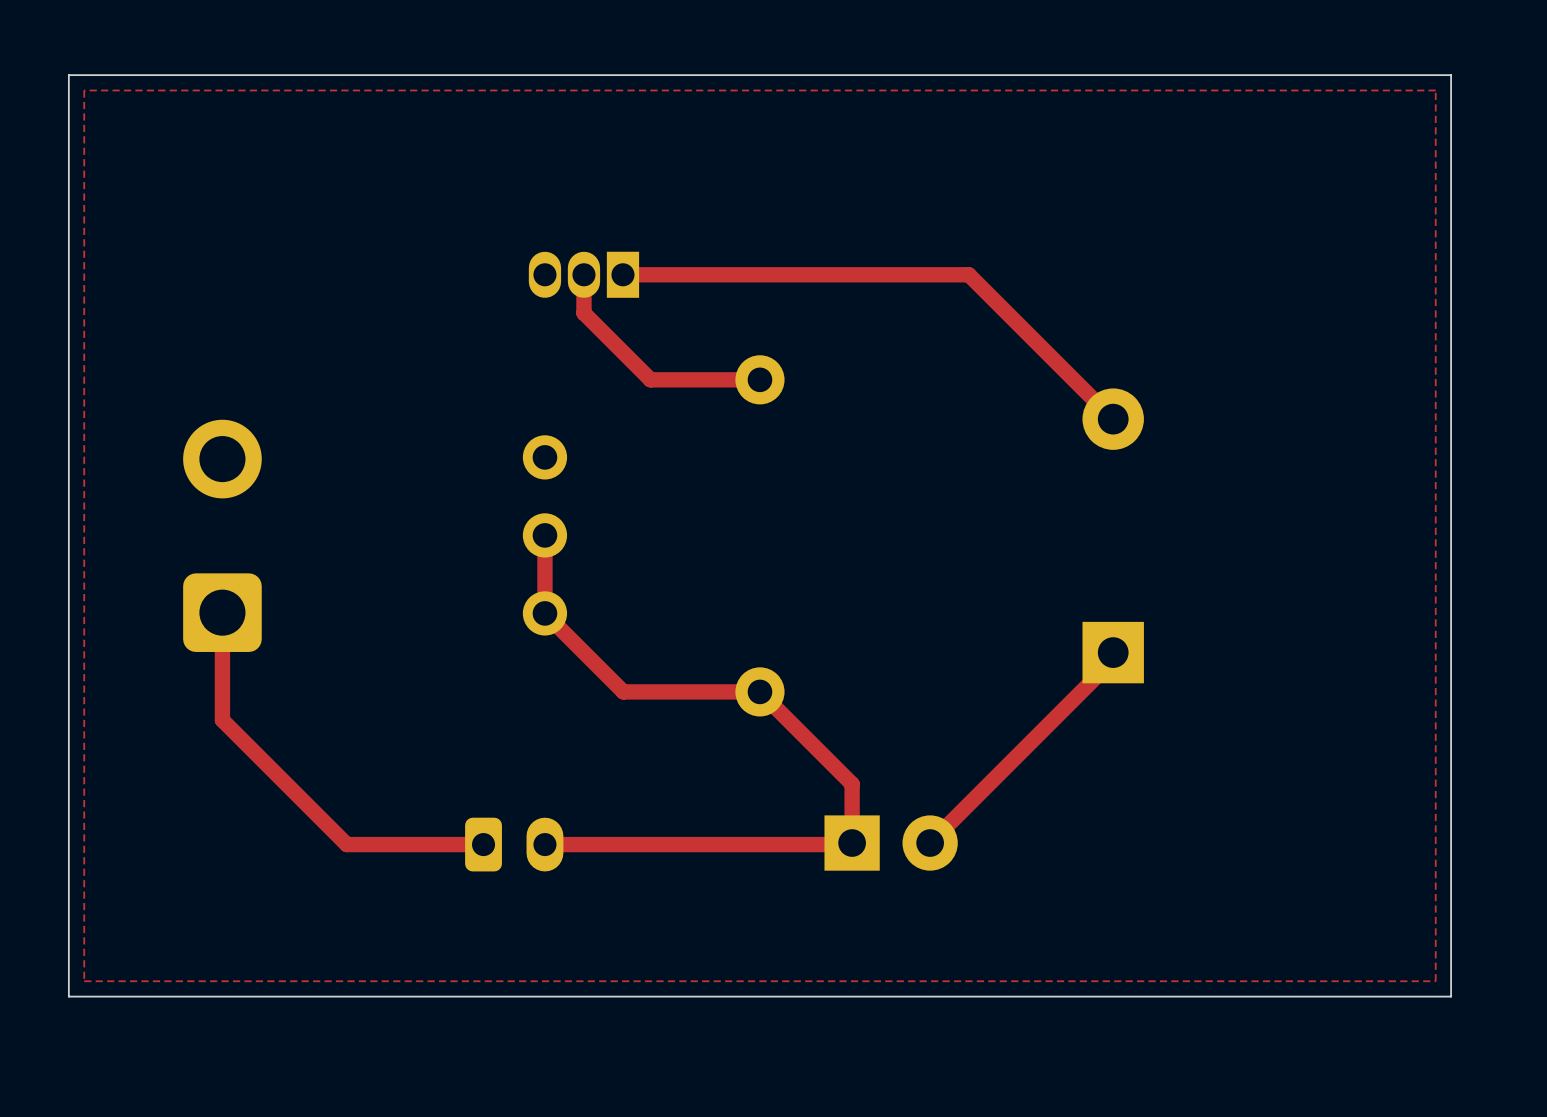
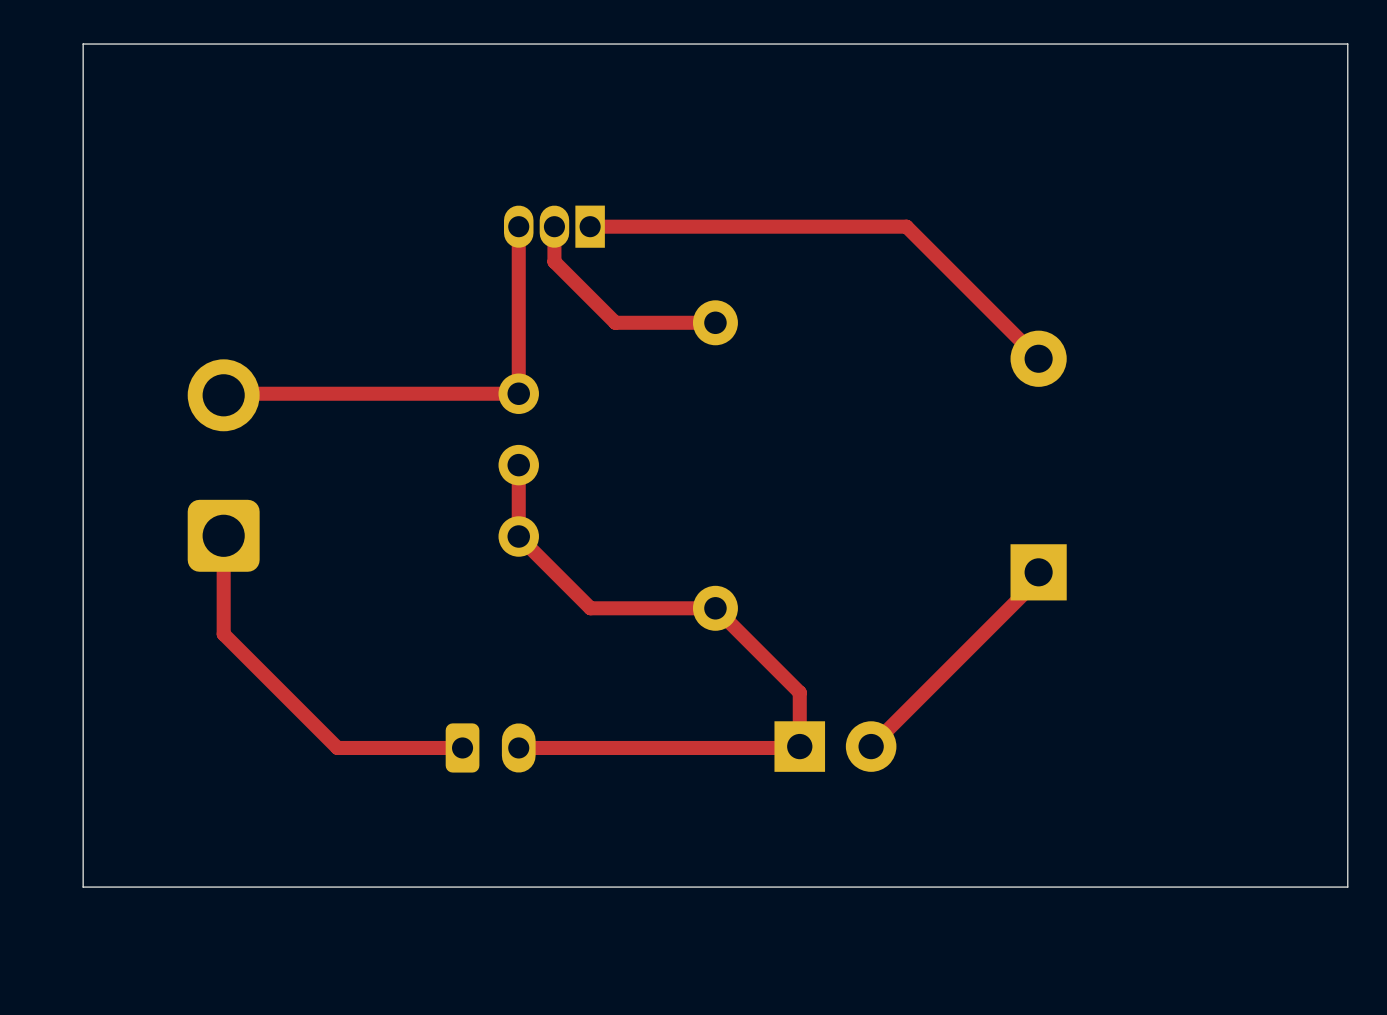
top zone outline: (1435, 90) (84, 90) (84, 981) (1435, 981) (1435, 90) -> none
top track: none -> (518, 226) (518, 393) (239, 393)

